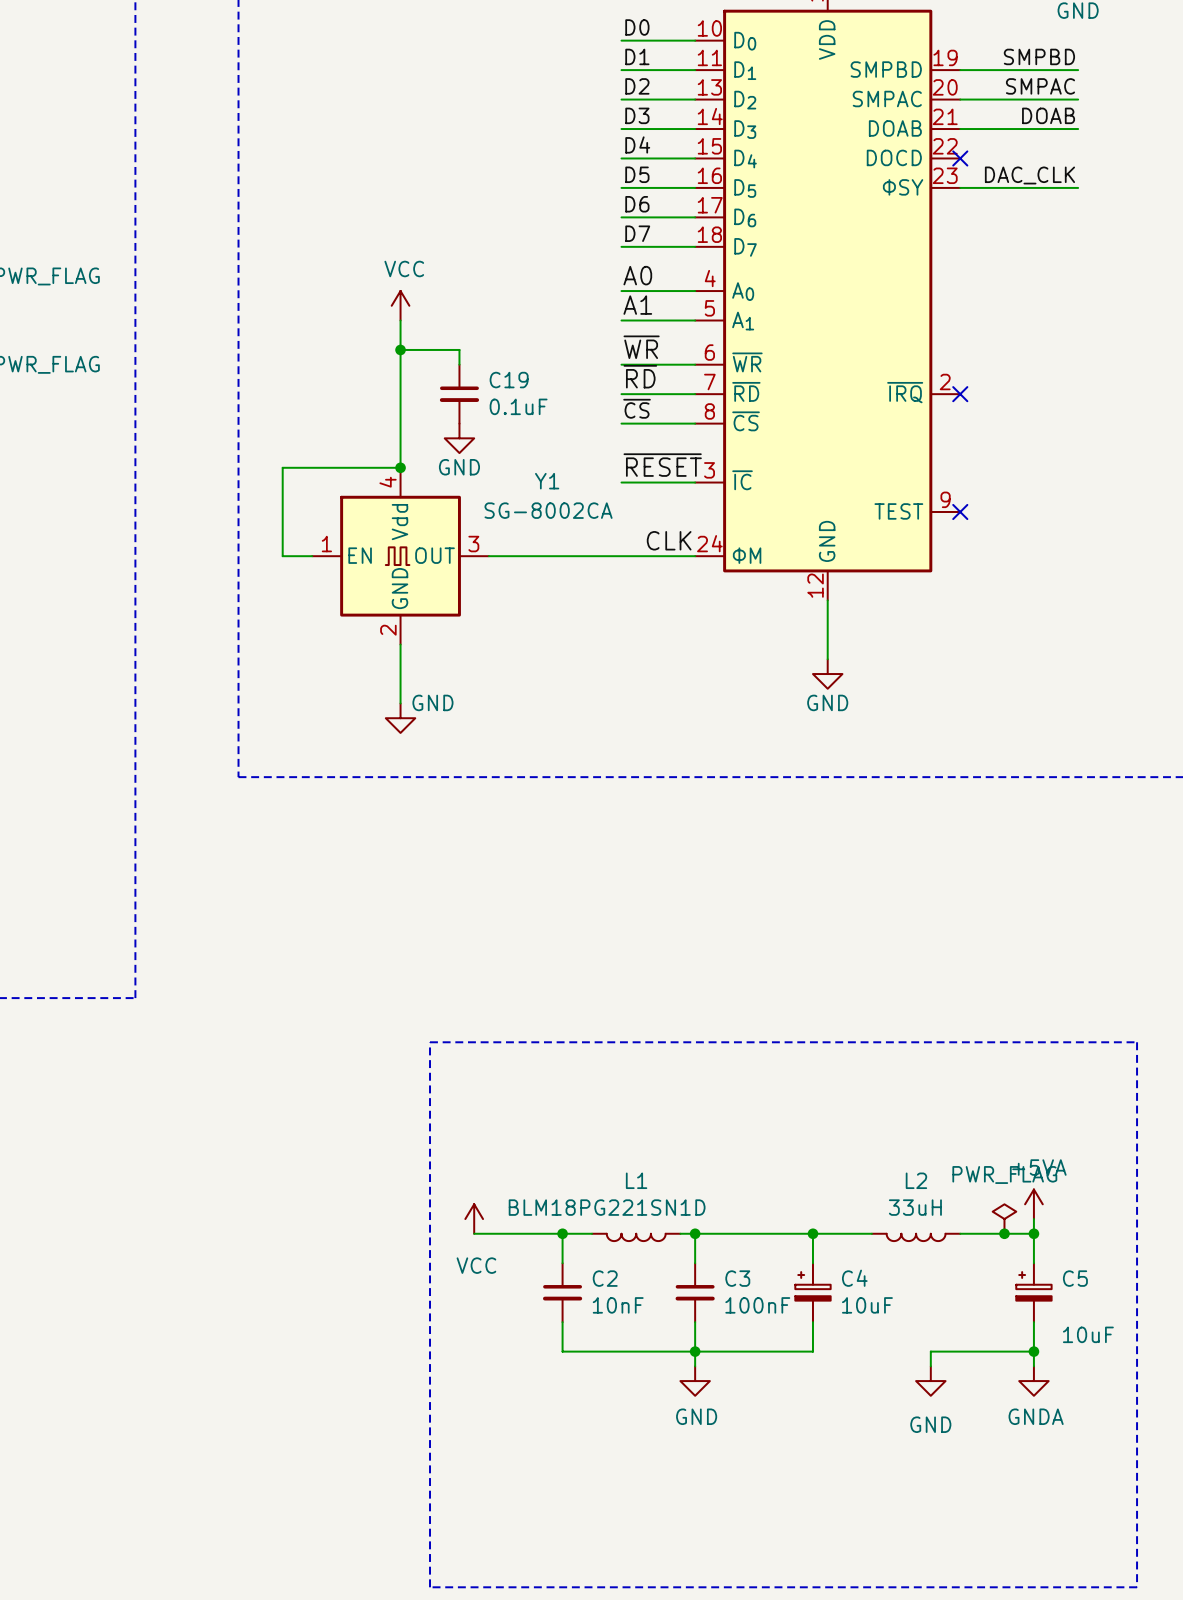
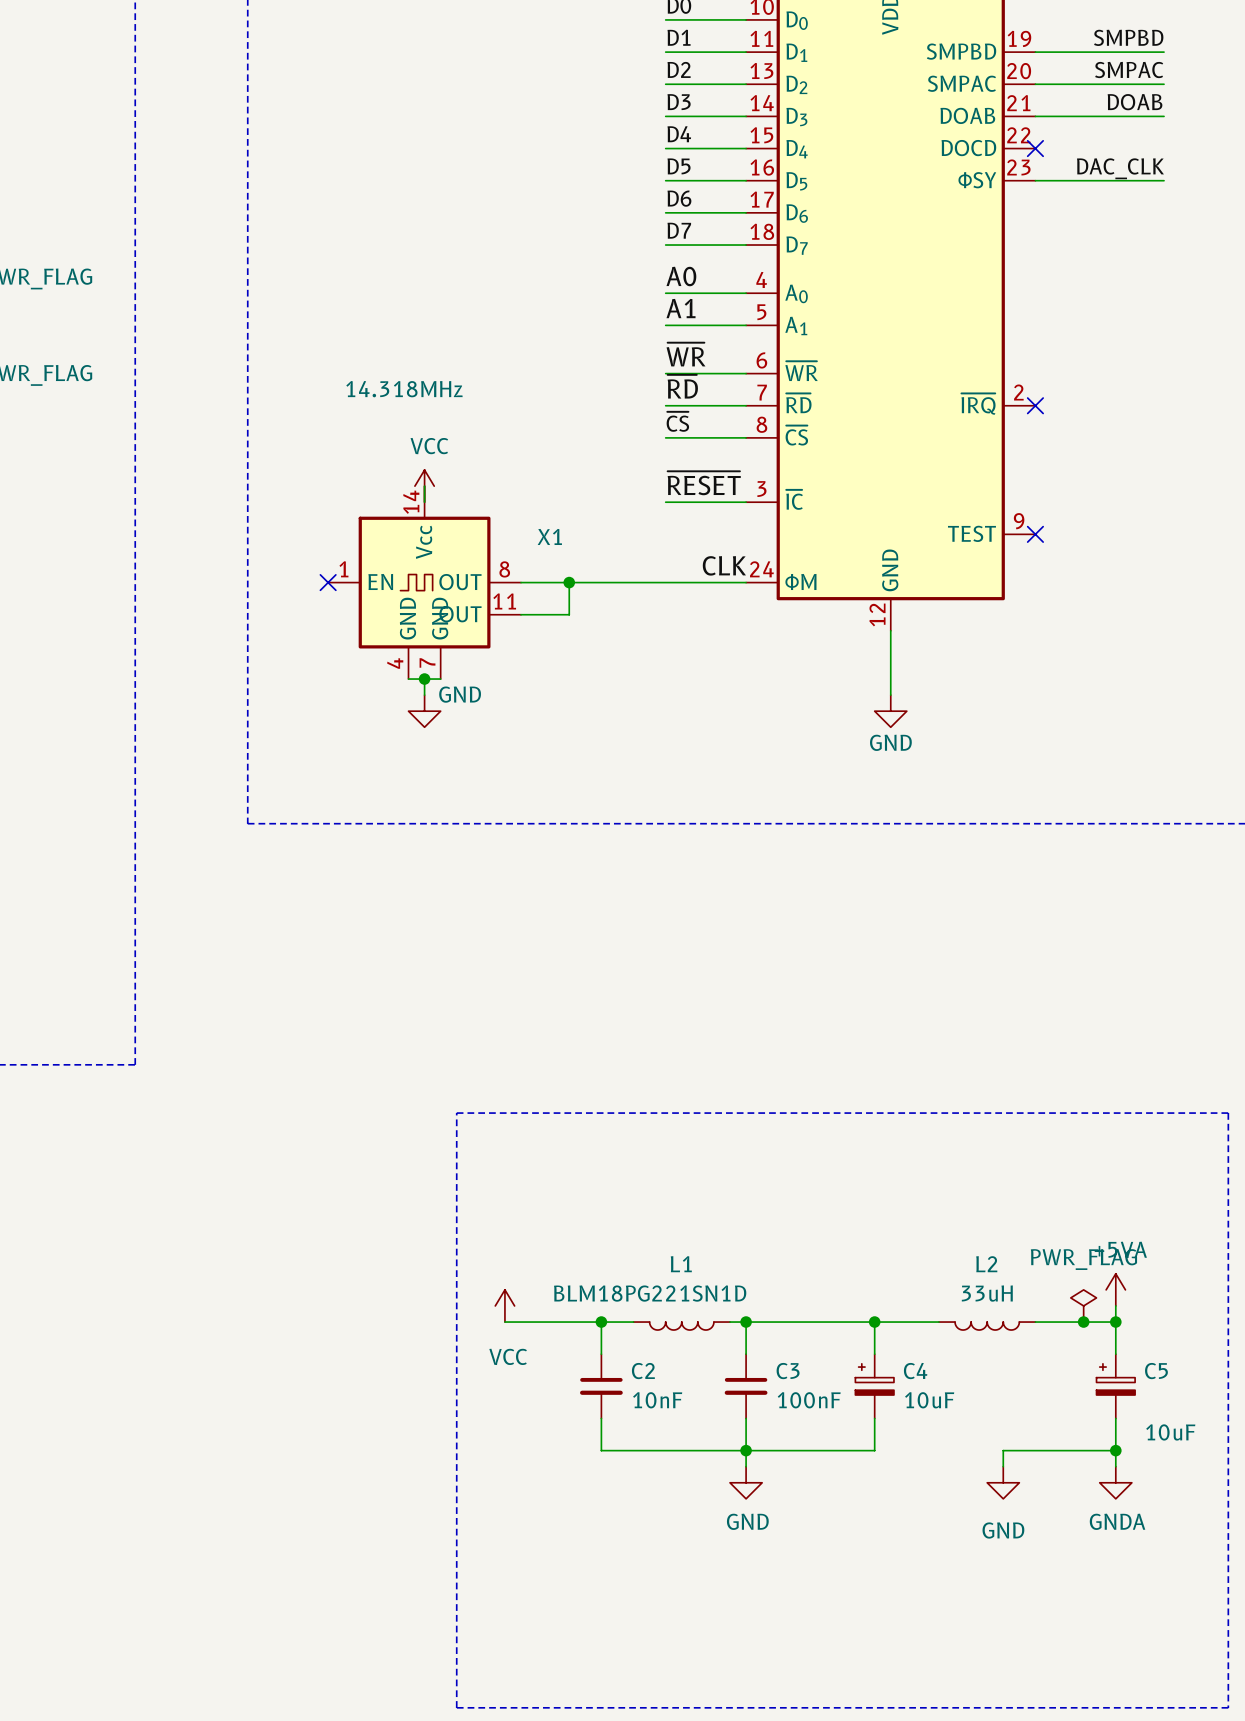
power symbol position: VCC (400, 305) -> VCC (424, 486)
wire: (400, 320) (400, 467) (282, 467) (282, 556) (312, 556) -> none
wire: (400, 349) (459, 349) (459, 364) -> none
junction: (400, 349) -> none
C19: 0.1uF (459, 394) -> none
power symbol: GND (459, 438) -> none
junction: (400, 467) -> none
no-connect mark: none -> (328, 582)
Y1: SG-8002CA (400, 556) -> none
X1: none -> 14.318MHz (424, 582)
wire: none -> (569, 582) (569, 614) (521, 614)
junction: none -> (569, 582)
wire: none -> (408, 679) (440, 679)
junction: none -> (424, 679)
wire: (400, 659) (400, 703) -> none
power symbol position: GND (400, 718) -> GND (424, 711)

